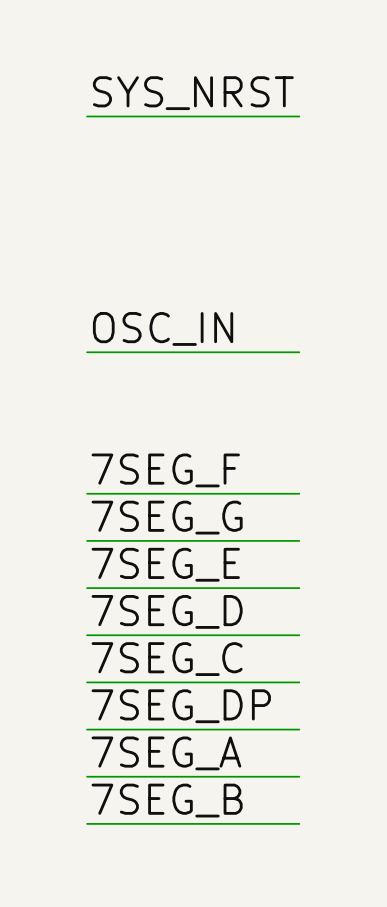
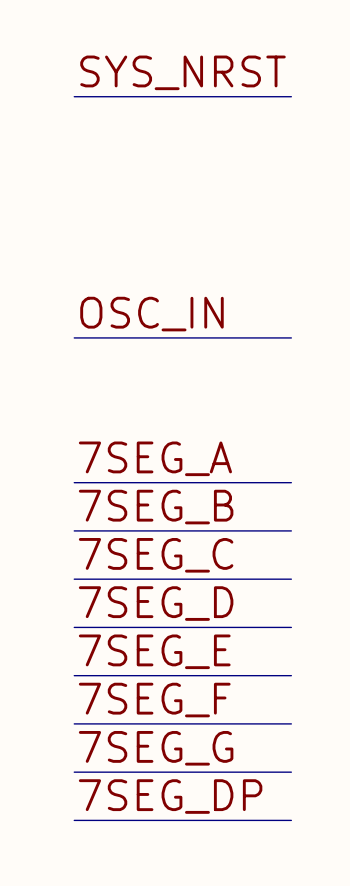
label: 7SEG_F (165, 470) -> 7SEG_A (155, 458)
label: 7SEG_G (167, 517) -> 7SEG_B (156, 507)
label: 7SEG_E (165, 564) -> 7SEG_C (156, 555)
label: 7SEG_C (167, 659) -> 7SEG_E (154, 651)
label: 7SEG_DP (181, 706) -> 7SEG_F (154, 700)
label: 7SEG_A (166, 753) -> 7SEG_G (156, 748)
label: 7SEG_B (167, 800) -> 7SEG_DP (170, 796)

